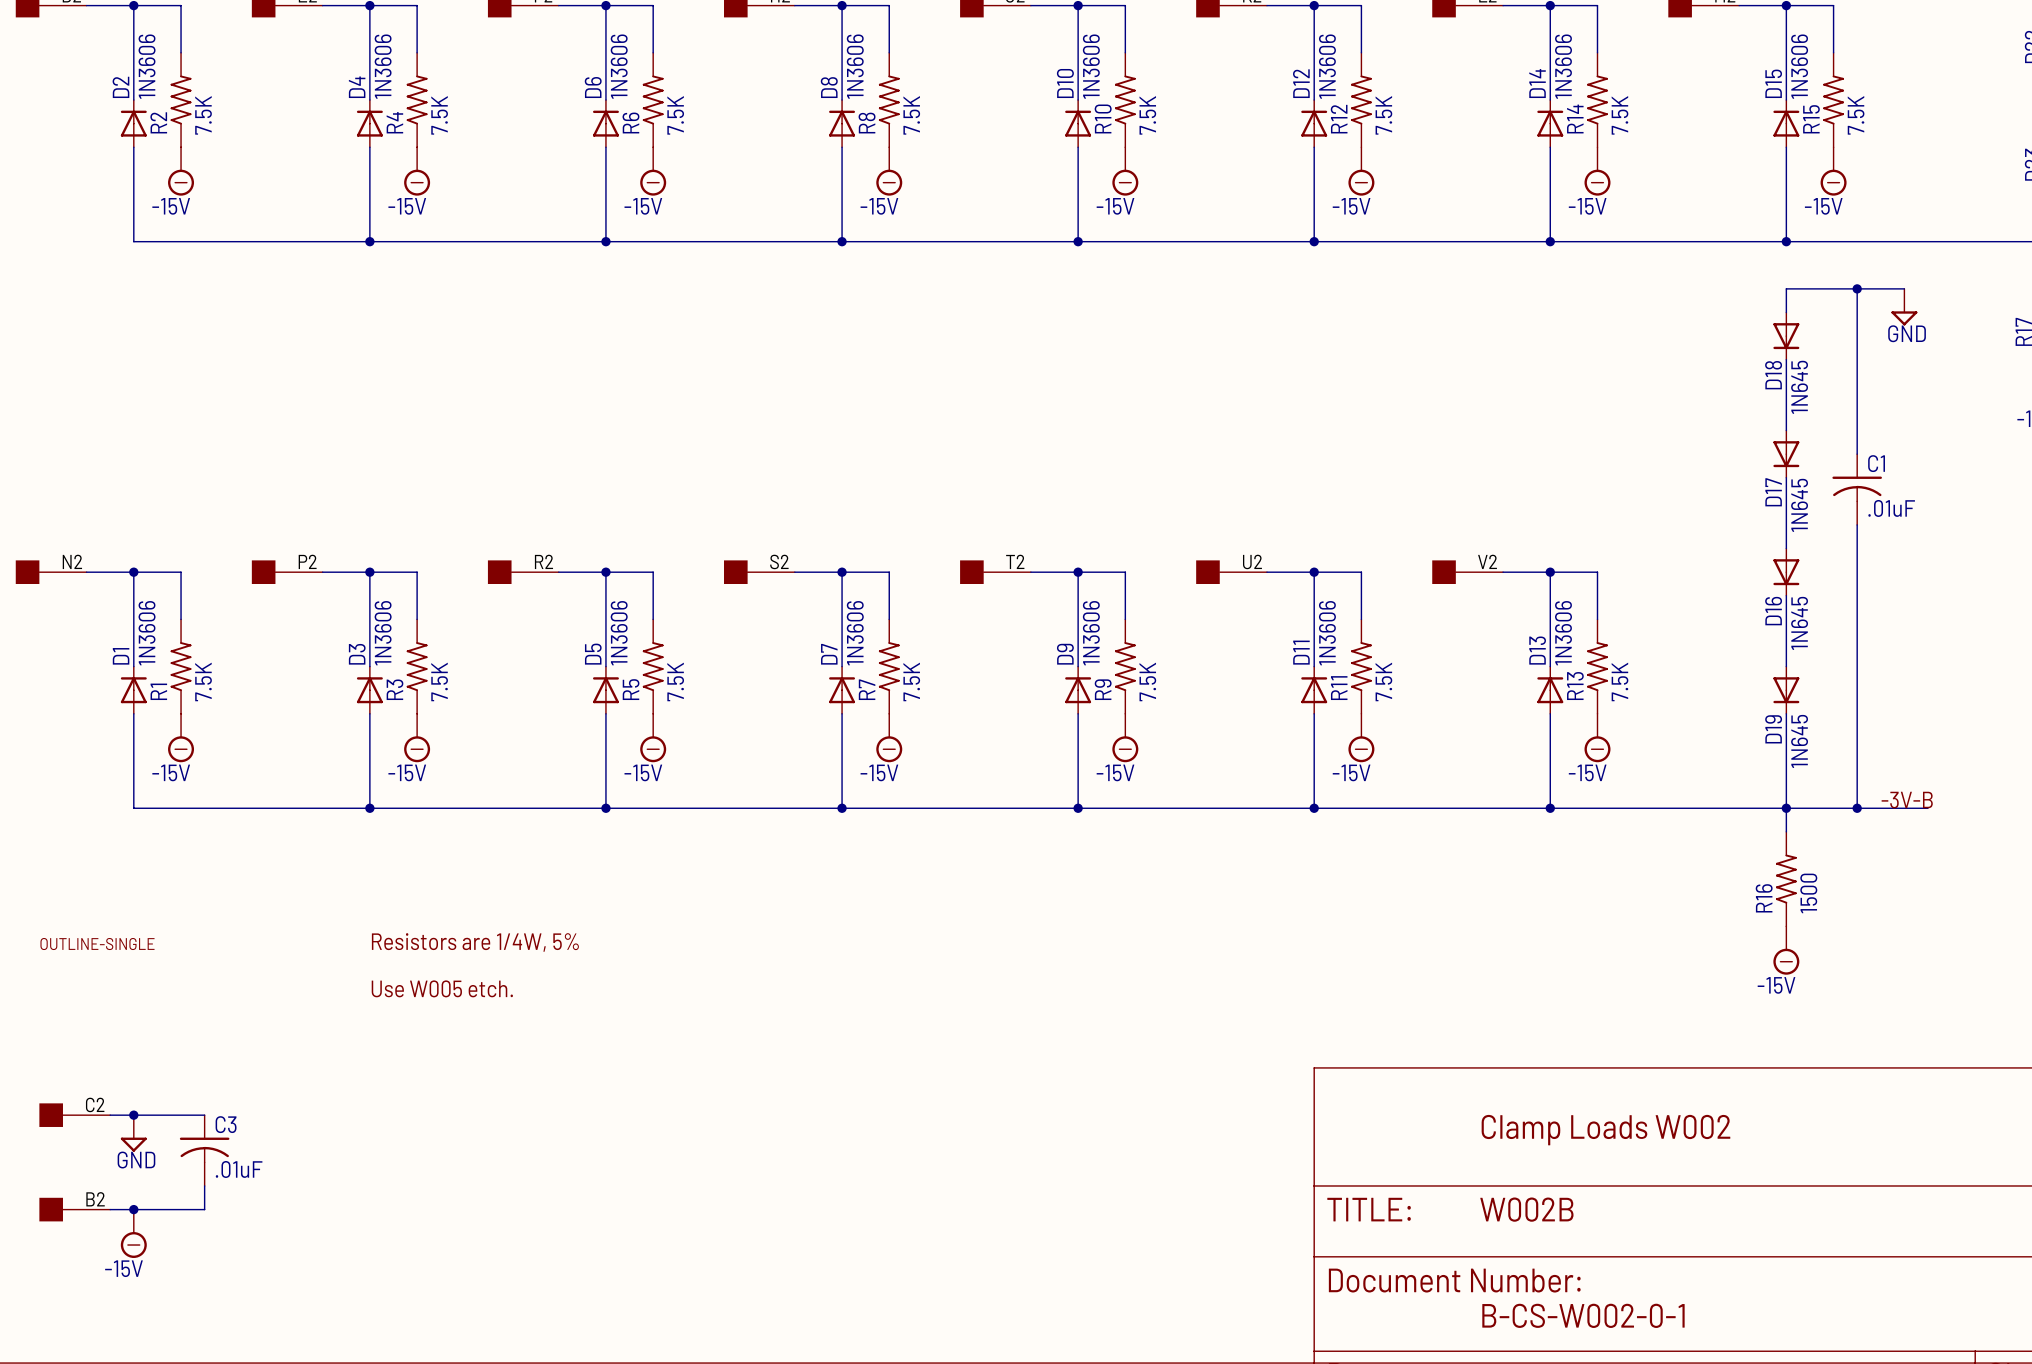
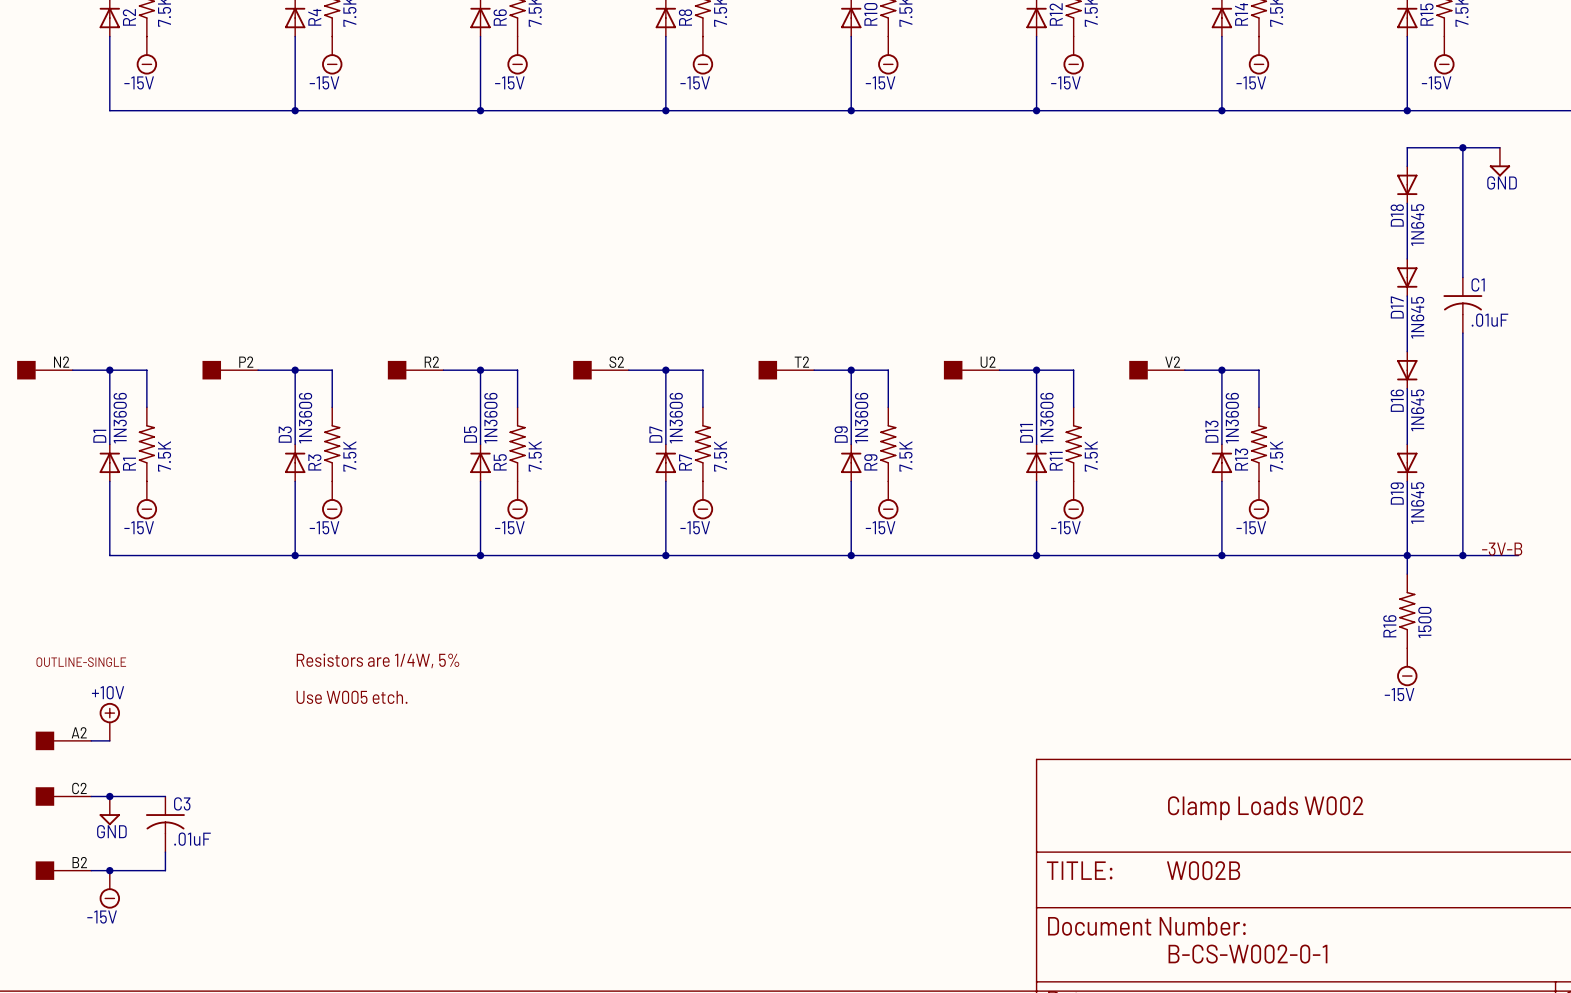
power symbol: none -> +10V (109, 721)
part: none -> (63, 740)
wire: none -> (91, 740) (109, 740)

